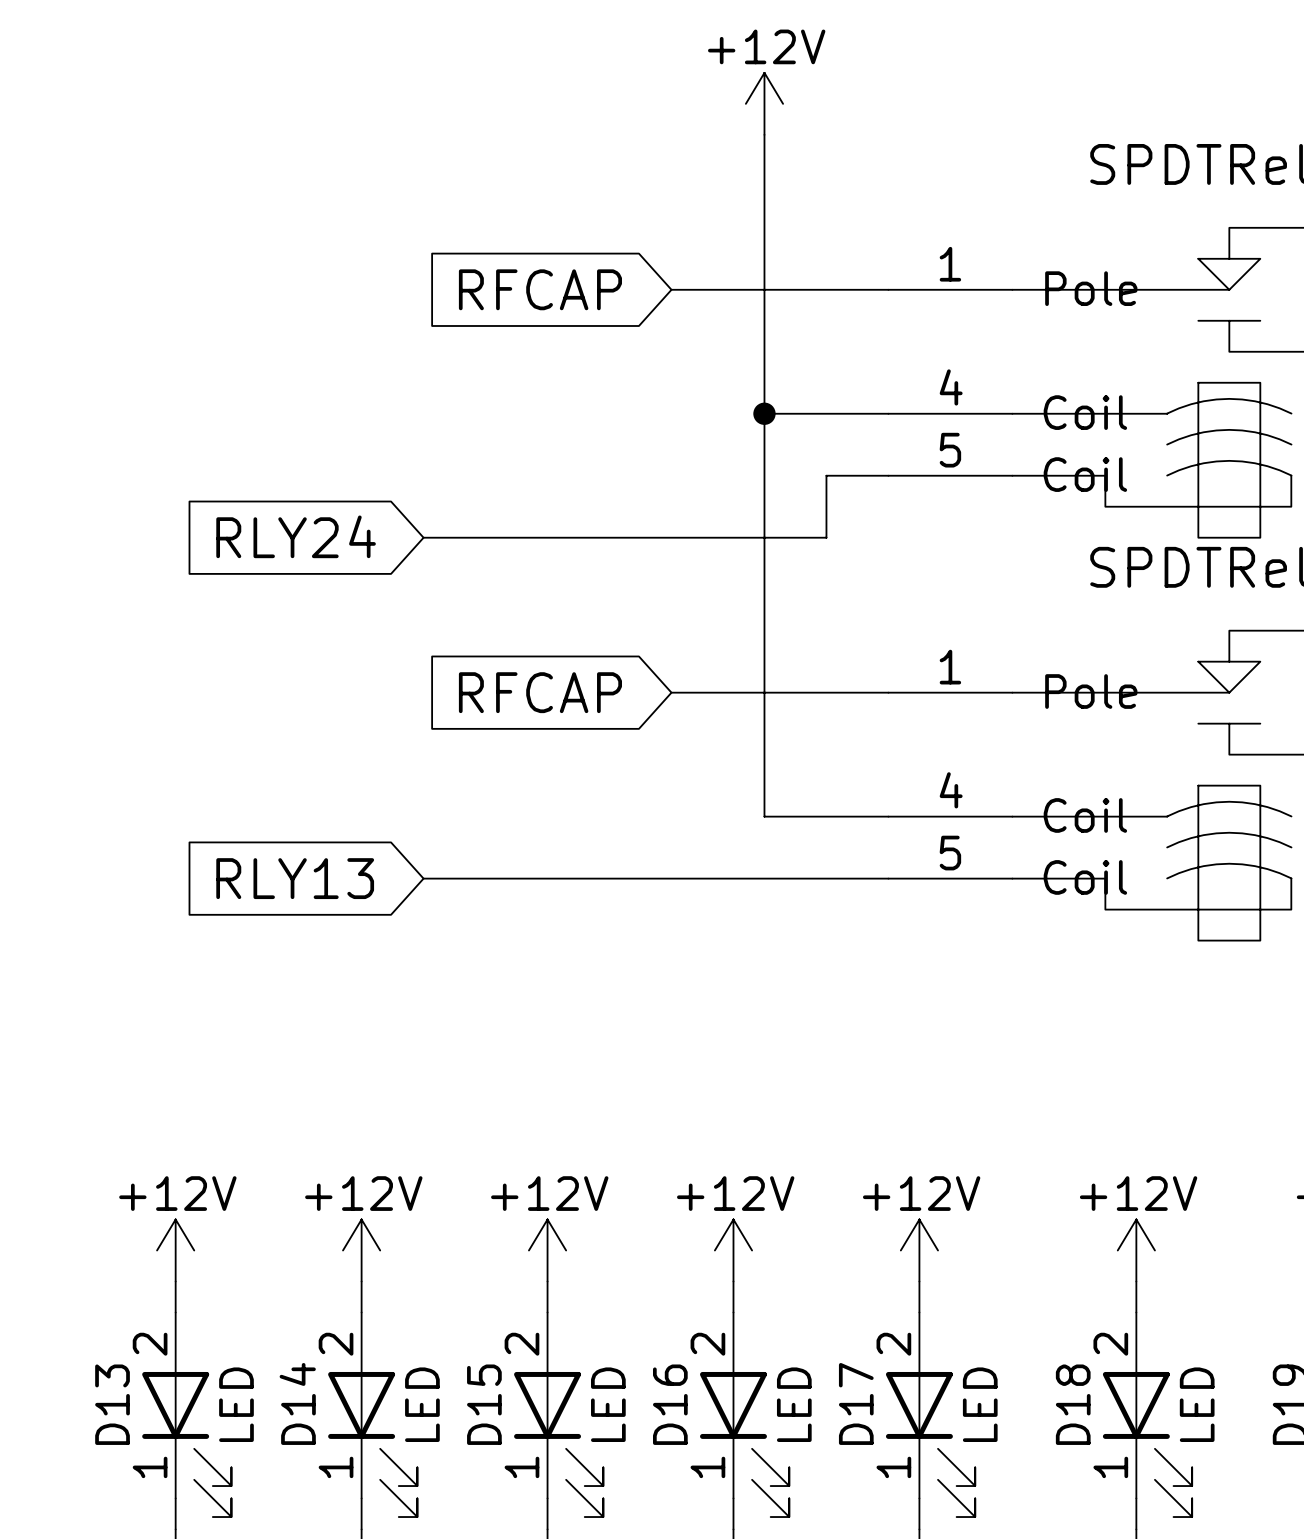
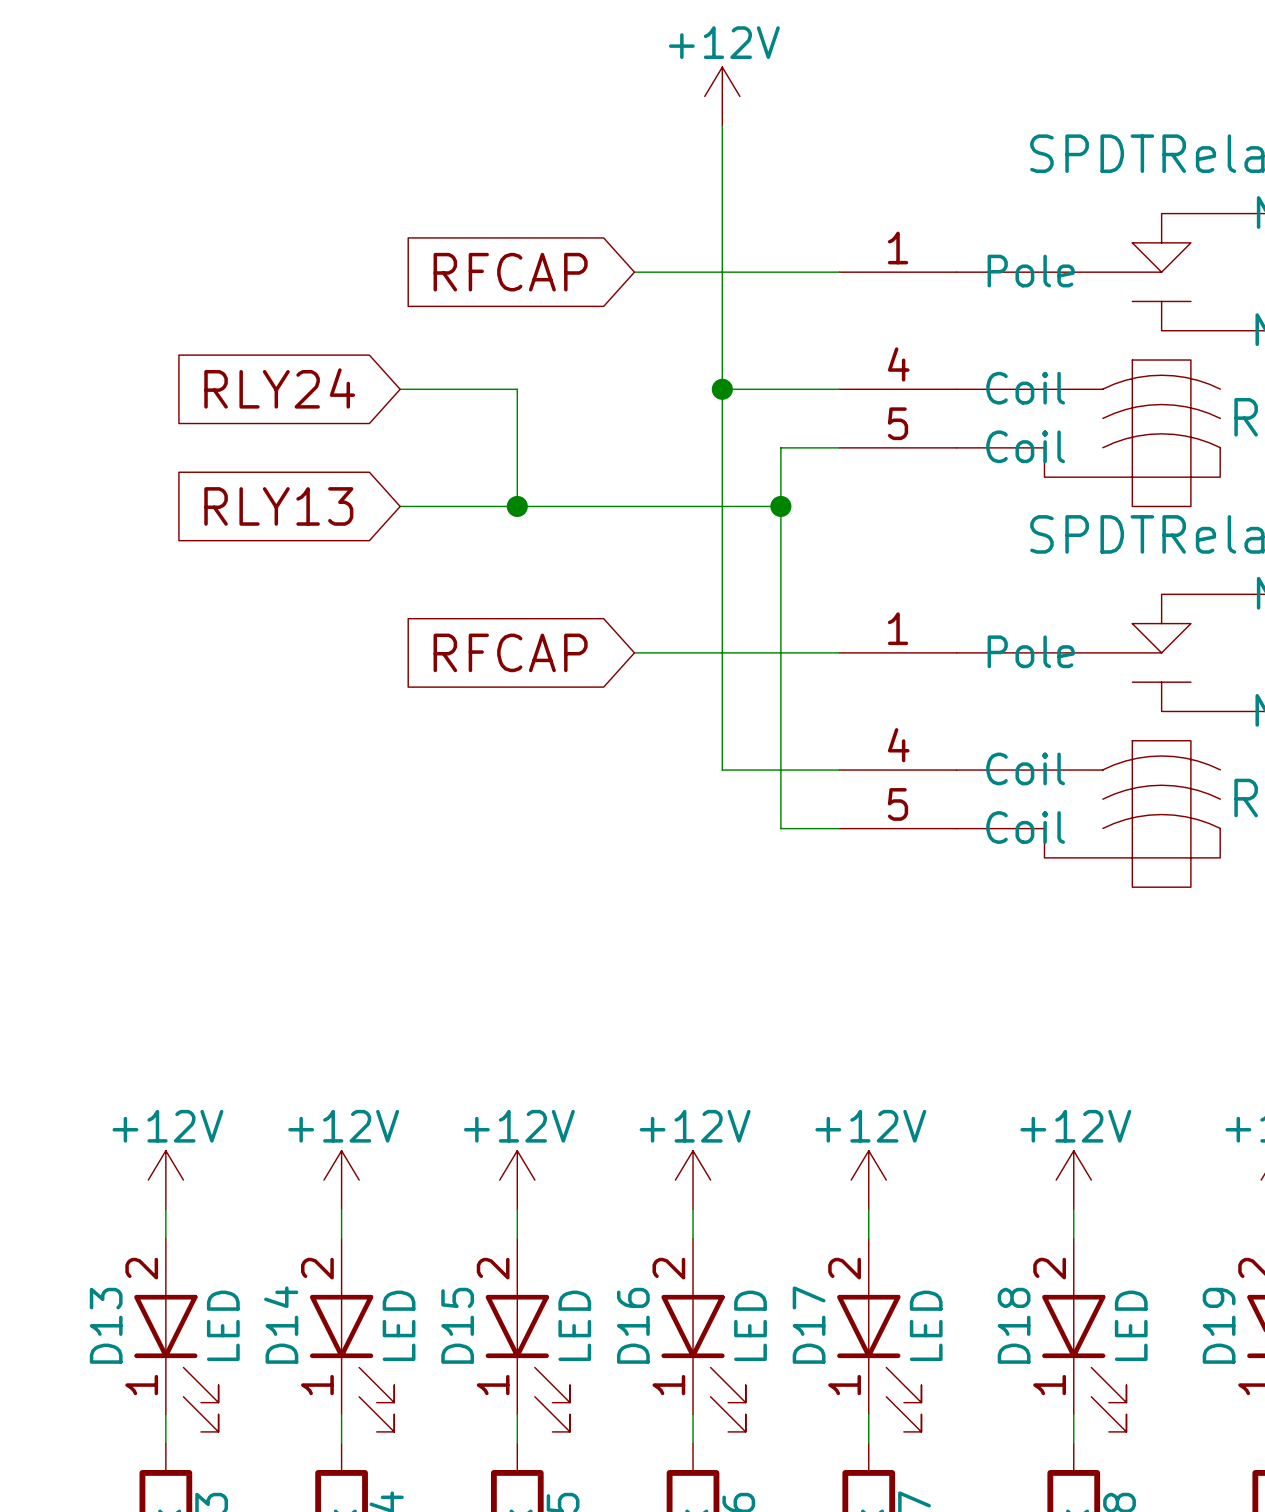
global label: none -> RLY24 (279, 388)
wire: none -> (400, 389) (517, 389) (517, 506)
global label: RLY24 (296, 536) -> RLY13 (278, 506)
junction: none -> (517, 506)
junction: none -> (780, 506)
global label: RLY13 (295, 878) -> none
wire: (423, 878) (826, 878) -> (780, 506) (780, 828)

